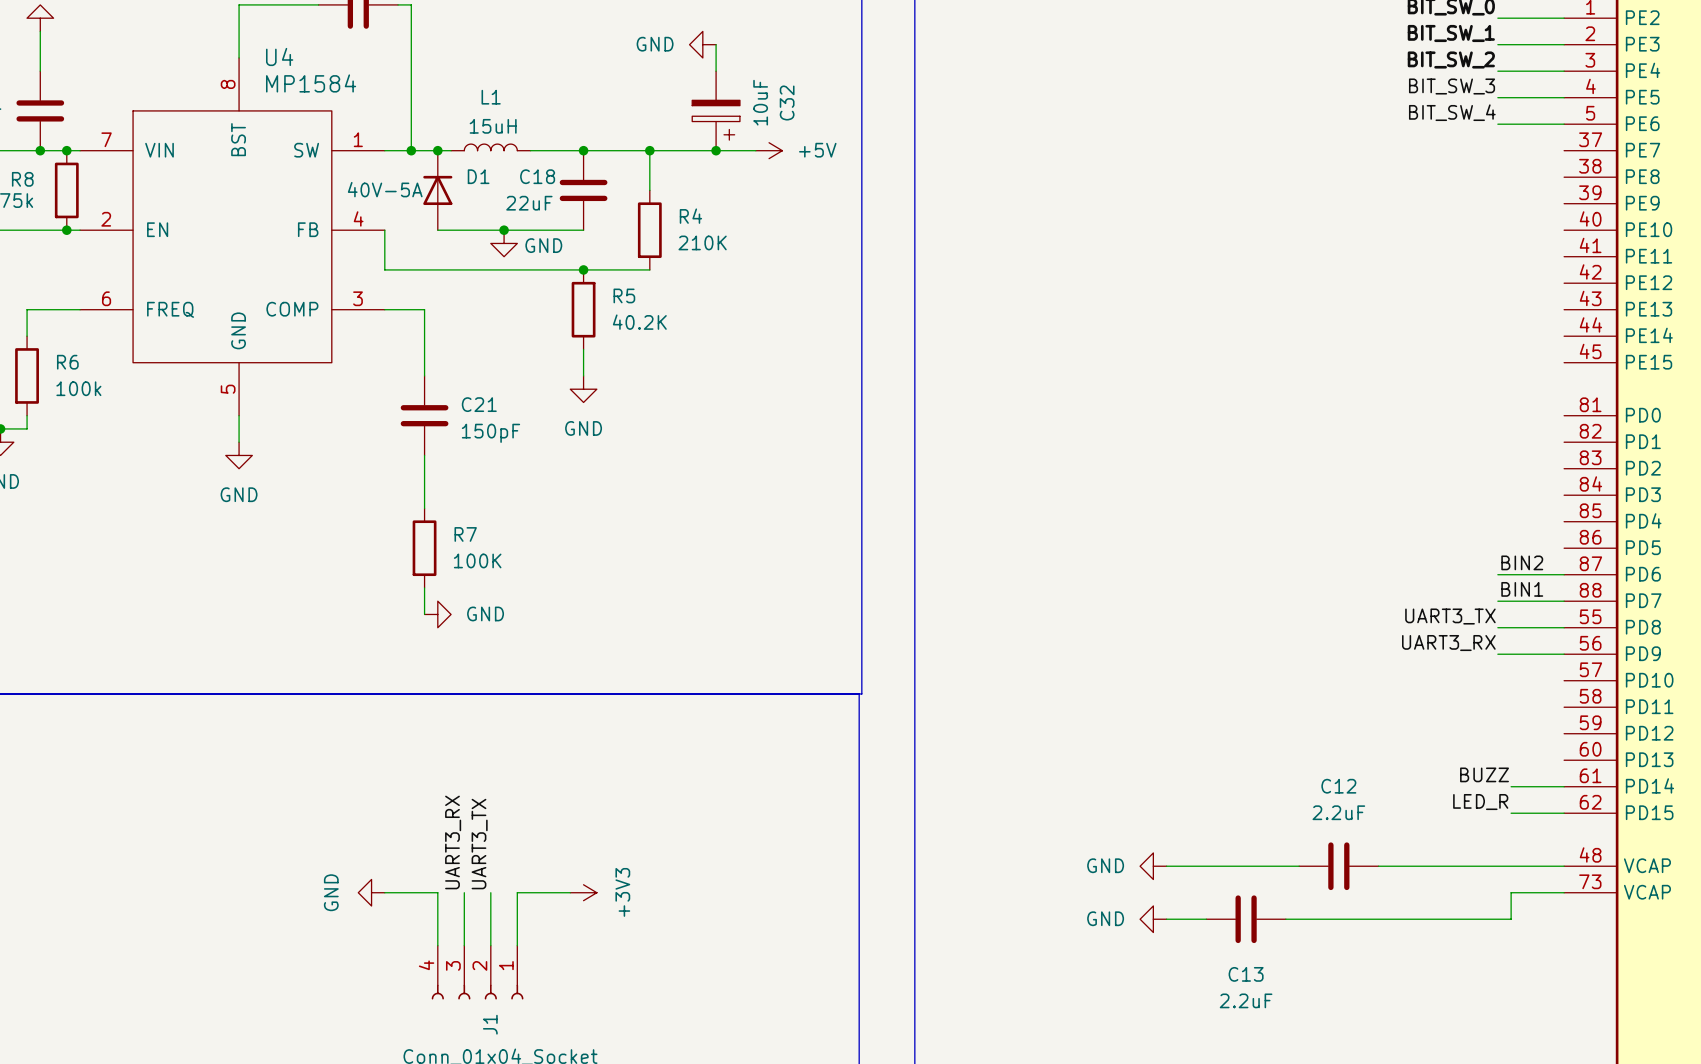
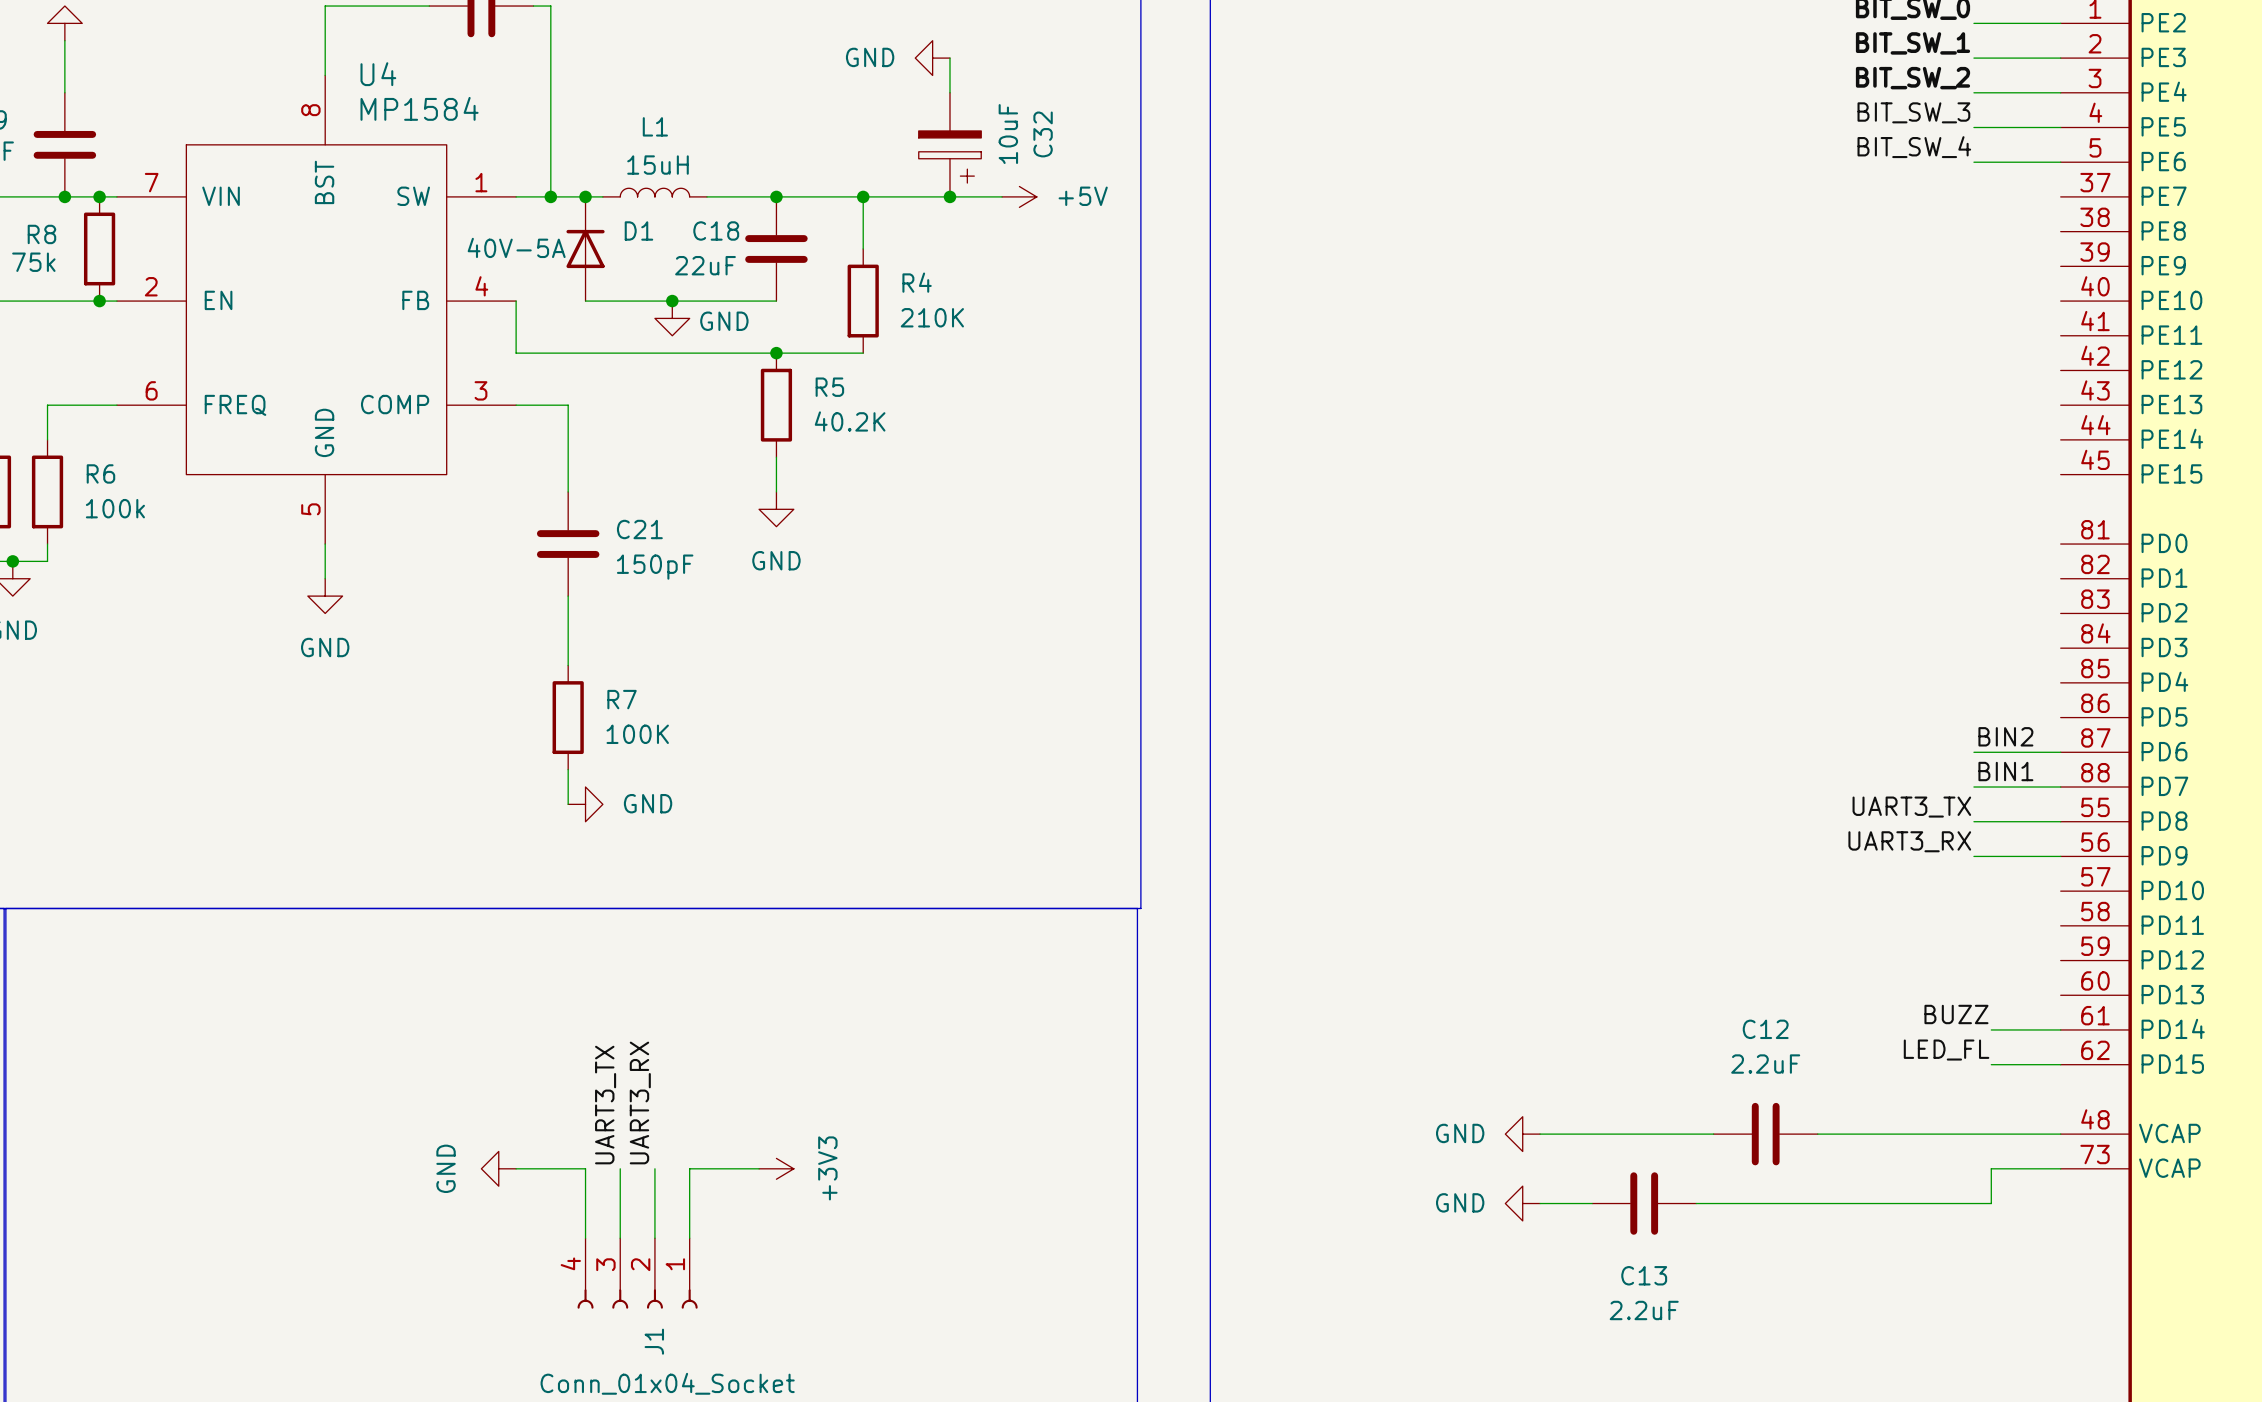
label: LED_R (1480, 802) -> LED_FL (1946, 1050)
label: UART3_RX (453, 842) -> UART3_TX (605, 1105)
label: UART3_TX (479, 844) -> UART3_RX (640, 1102)

